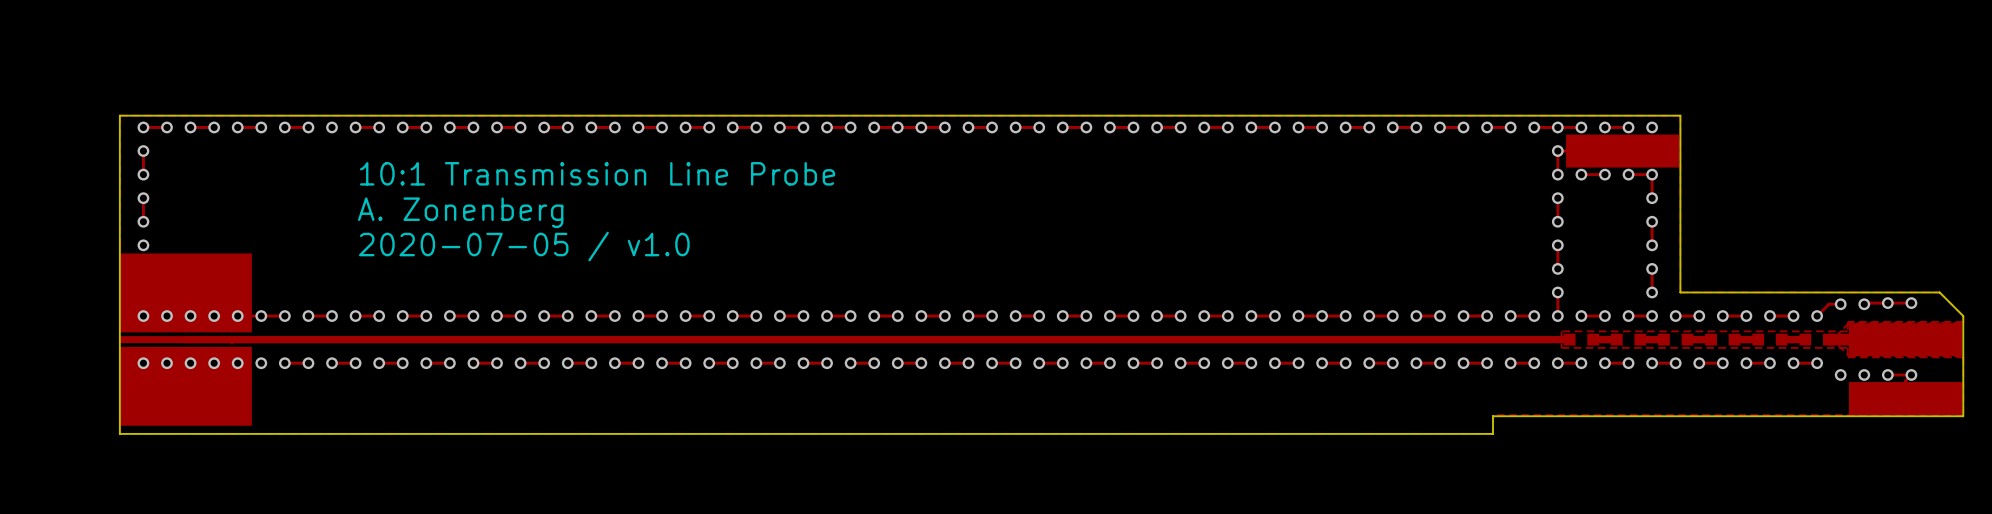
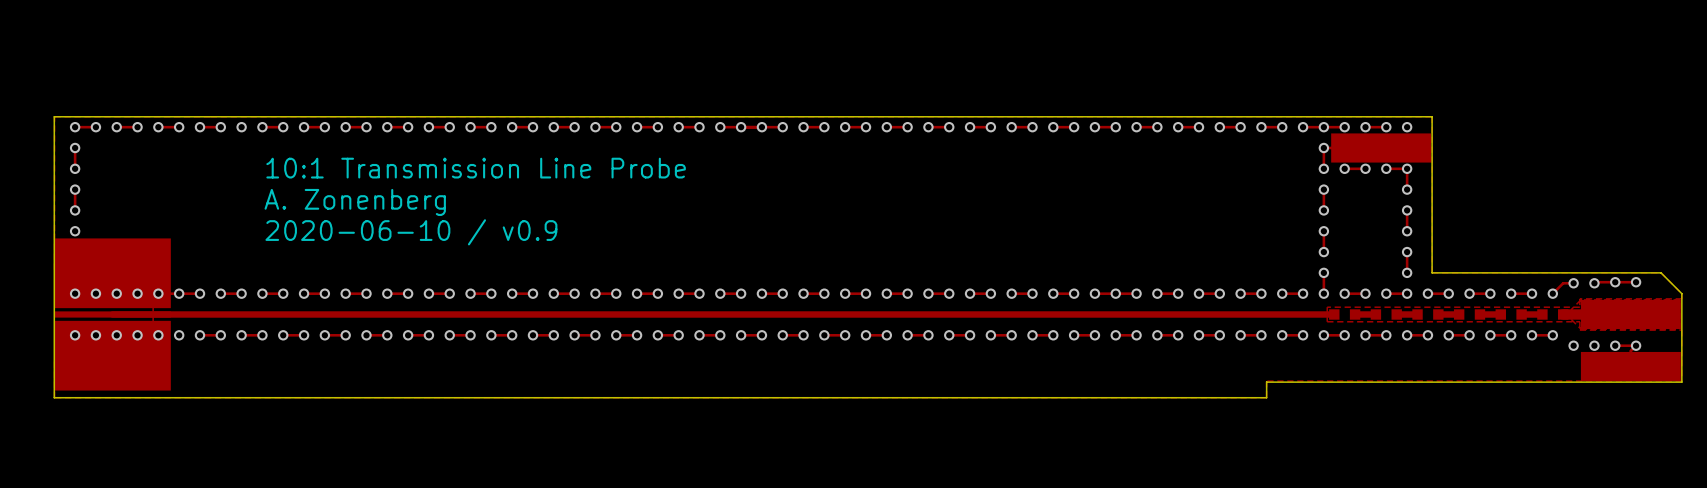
text: 2020-07-05 / v1.0 (524, 246) -> 2020-06-10 / v0.9 (411, 232)

